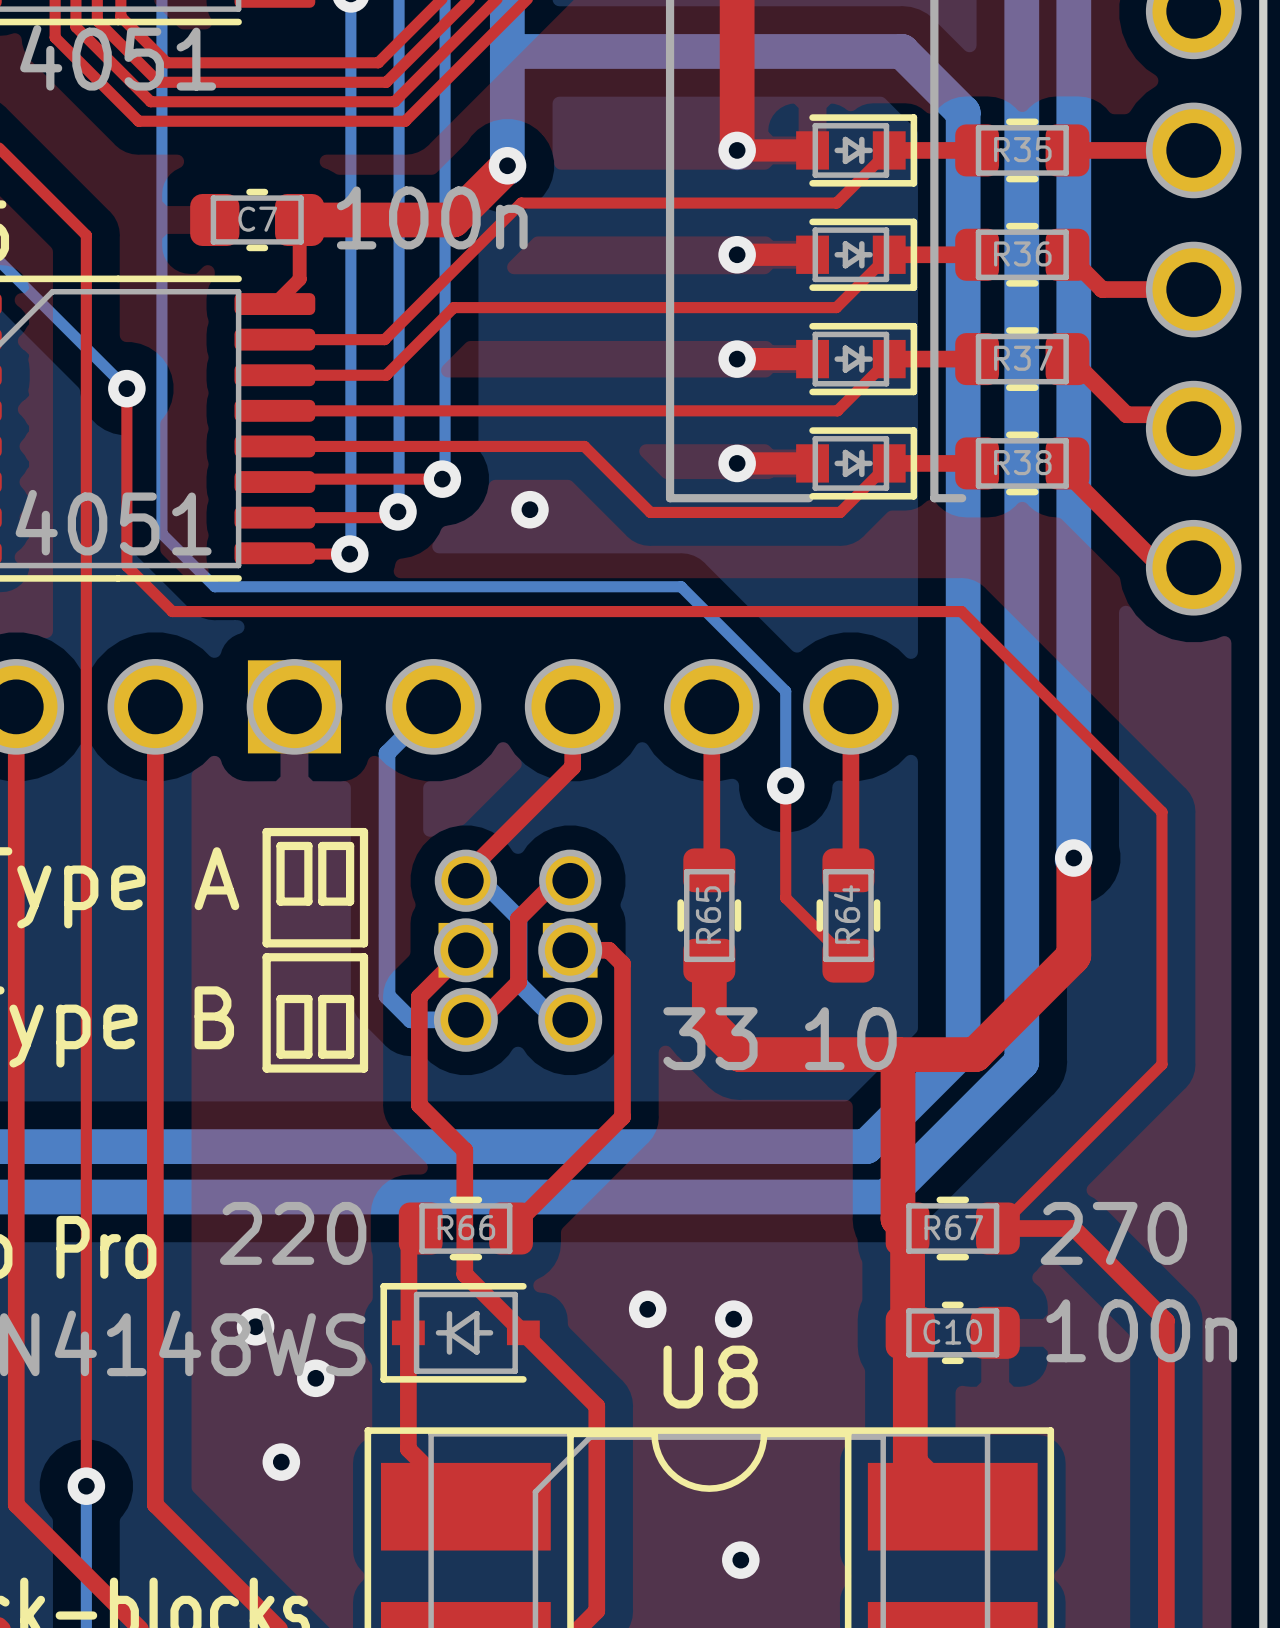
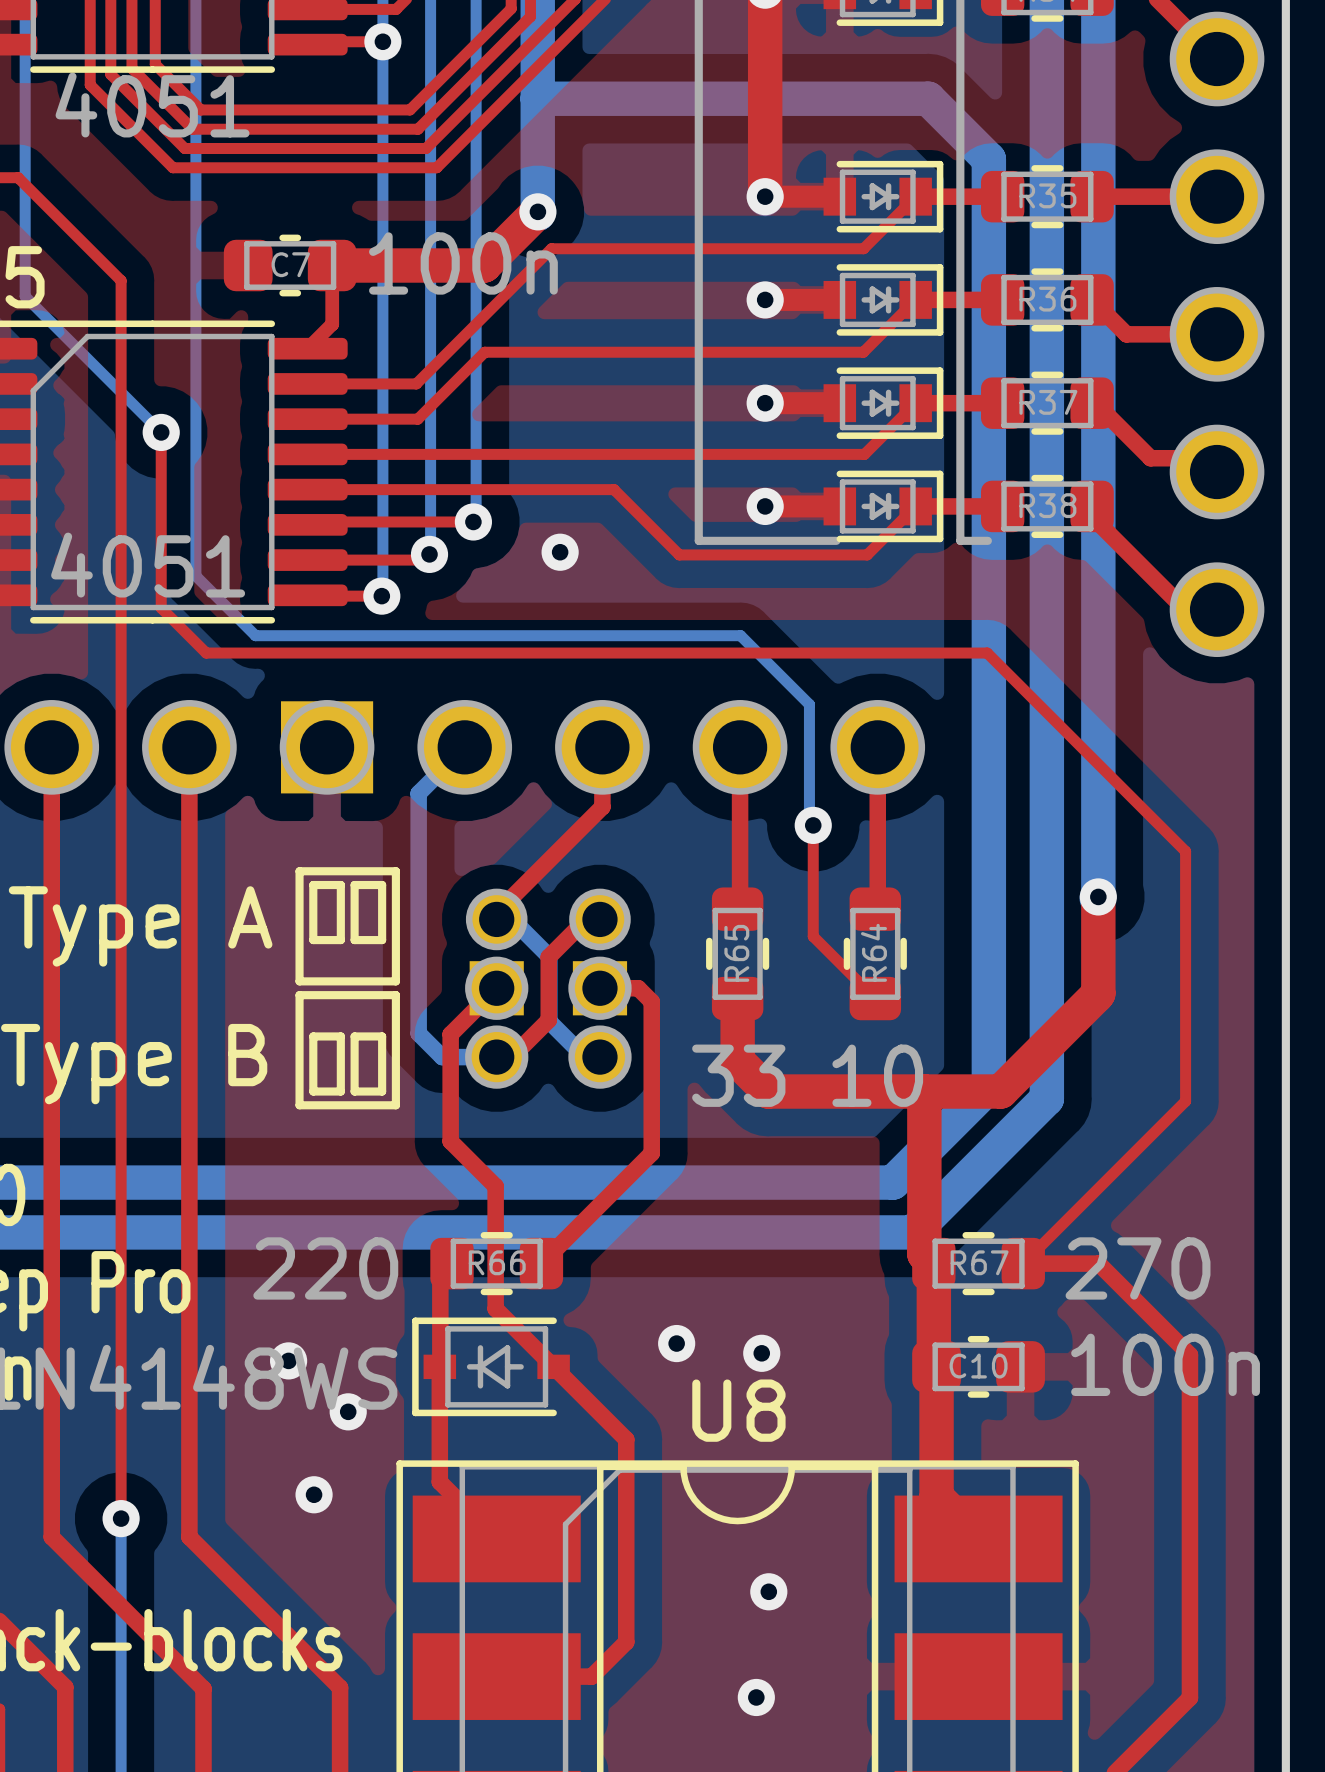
bottom track: (214, 586) (681, 586) (785, 691) (785, 785) -> (248, 628) (255, 635) (740, 635) (809, 704) (809, 821) (813, 825)

